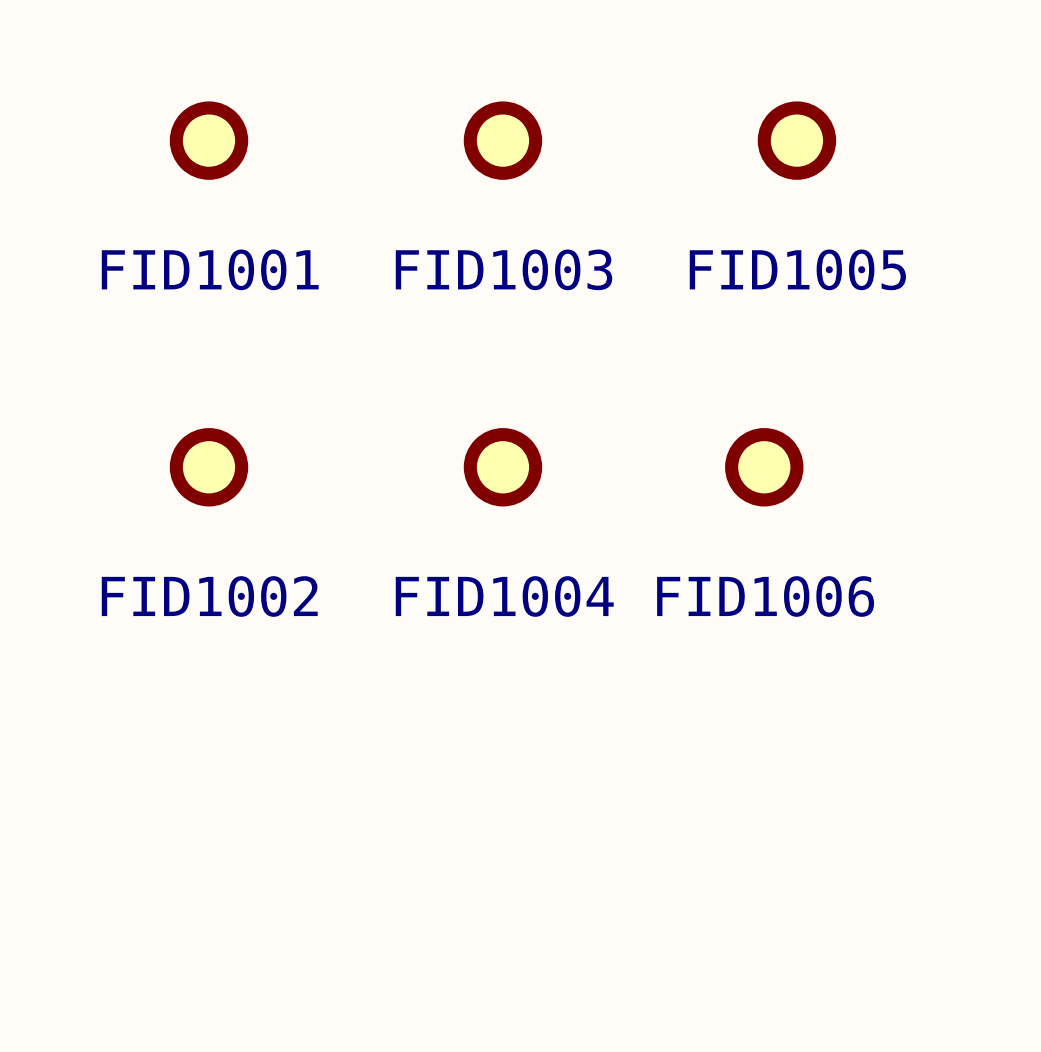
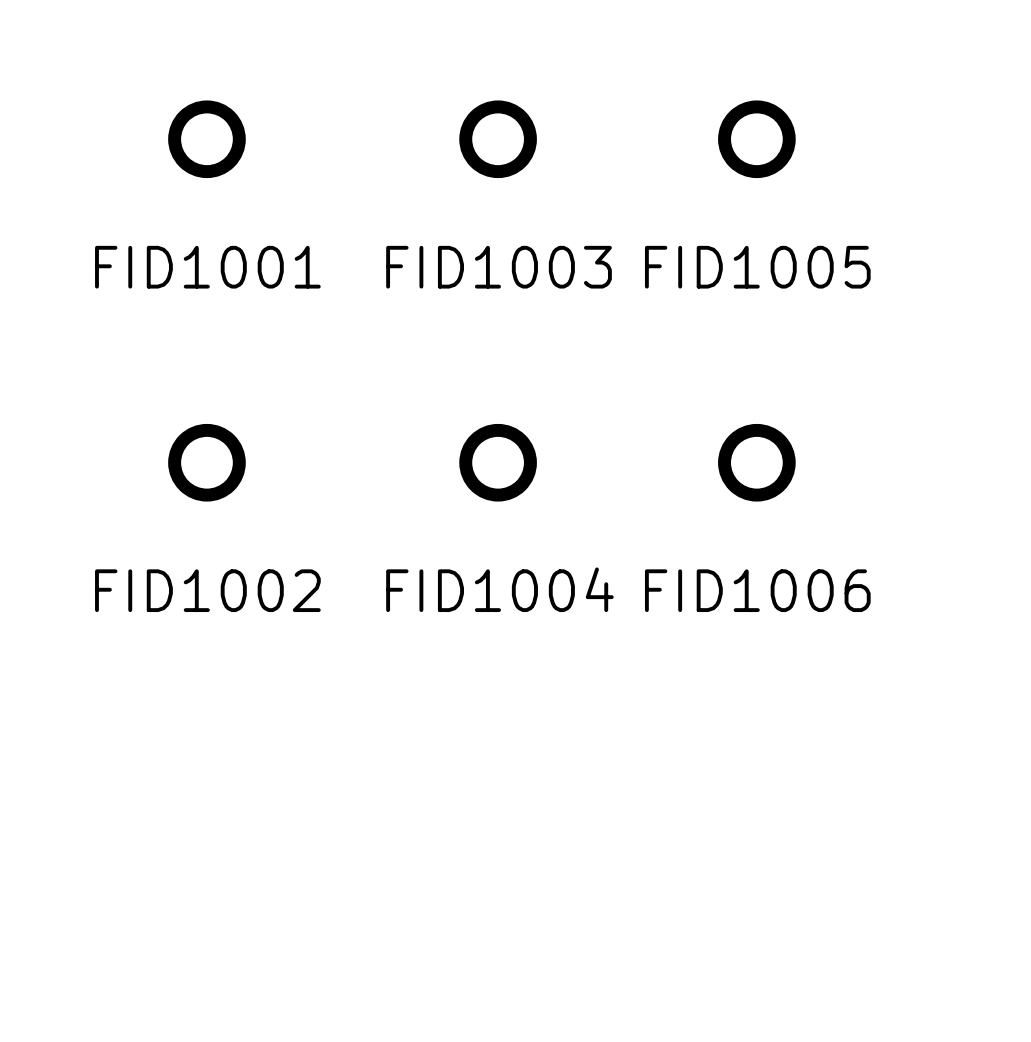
FID1005 position: (796, 140) -> (756, 139)

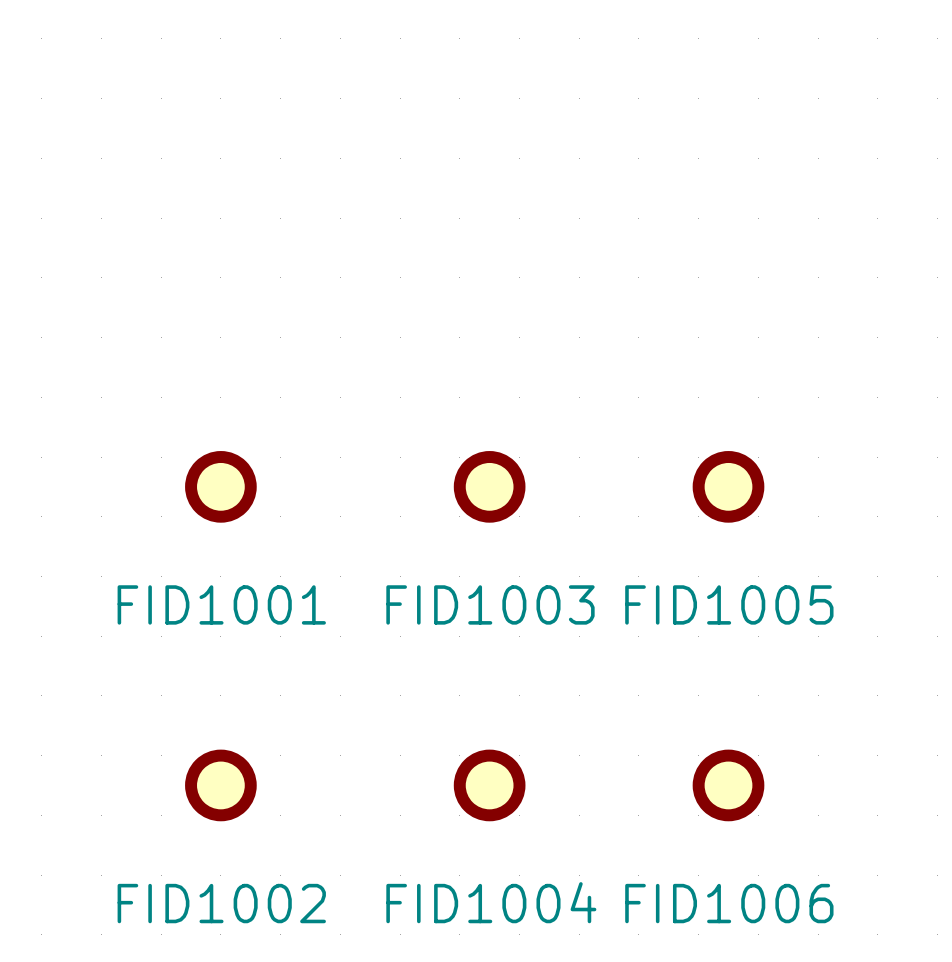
FID1001 position: (206, 139) -> (220, 486)
FID1003 position: (498, 139) -> (489, 486)
FID1005 position: (756, 139) -> (728, 486)
FID1002 position: (206, 462) -> (220, 785)
FID1004 position: (498, 462) -> (489, 785)
FID1006 position: (756, 462) -> (728, 785)

